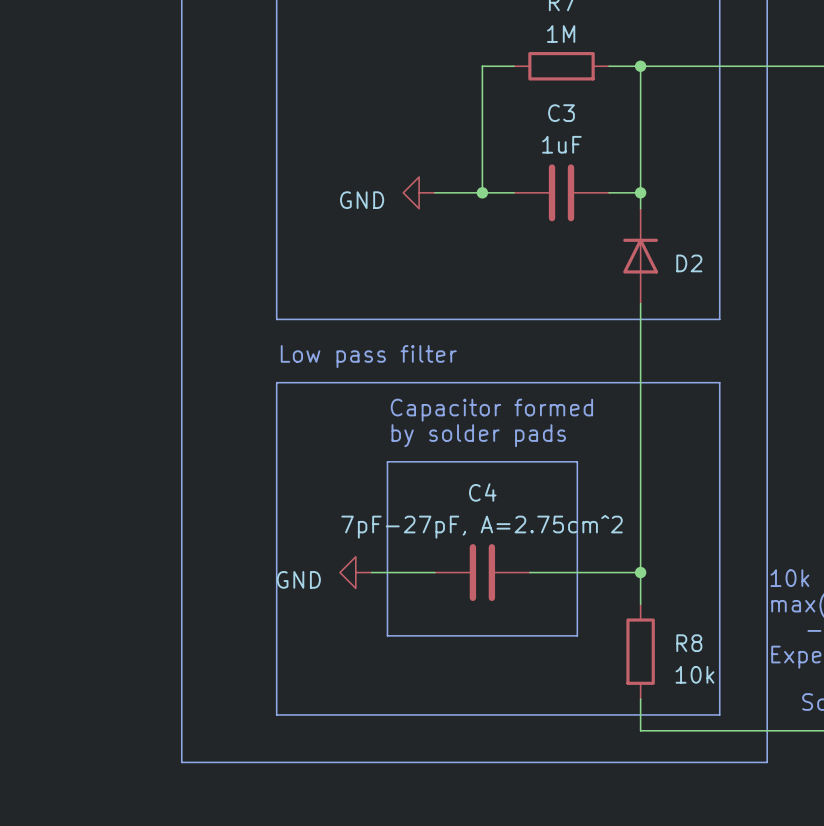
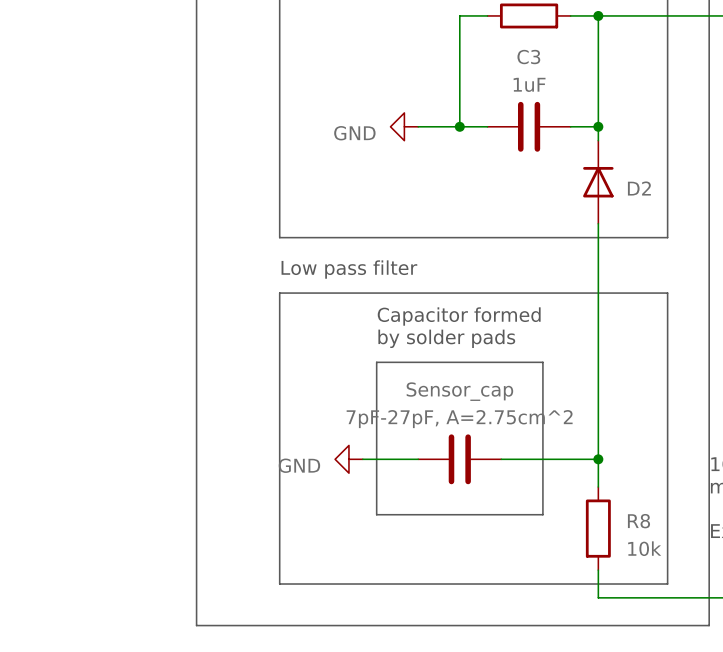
C4 name: C4 (482, 492) -> Sensor_cap (459, 391)

